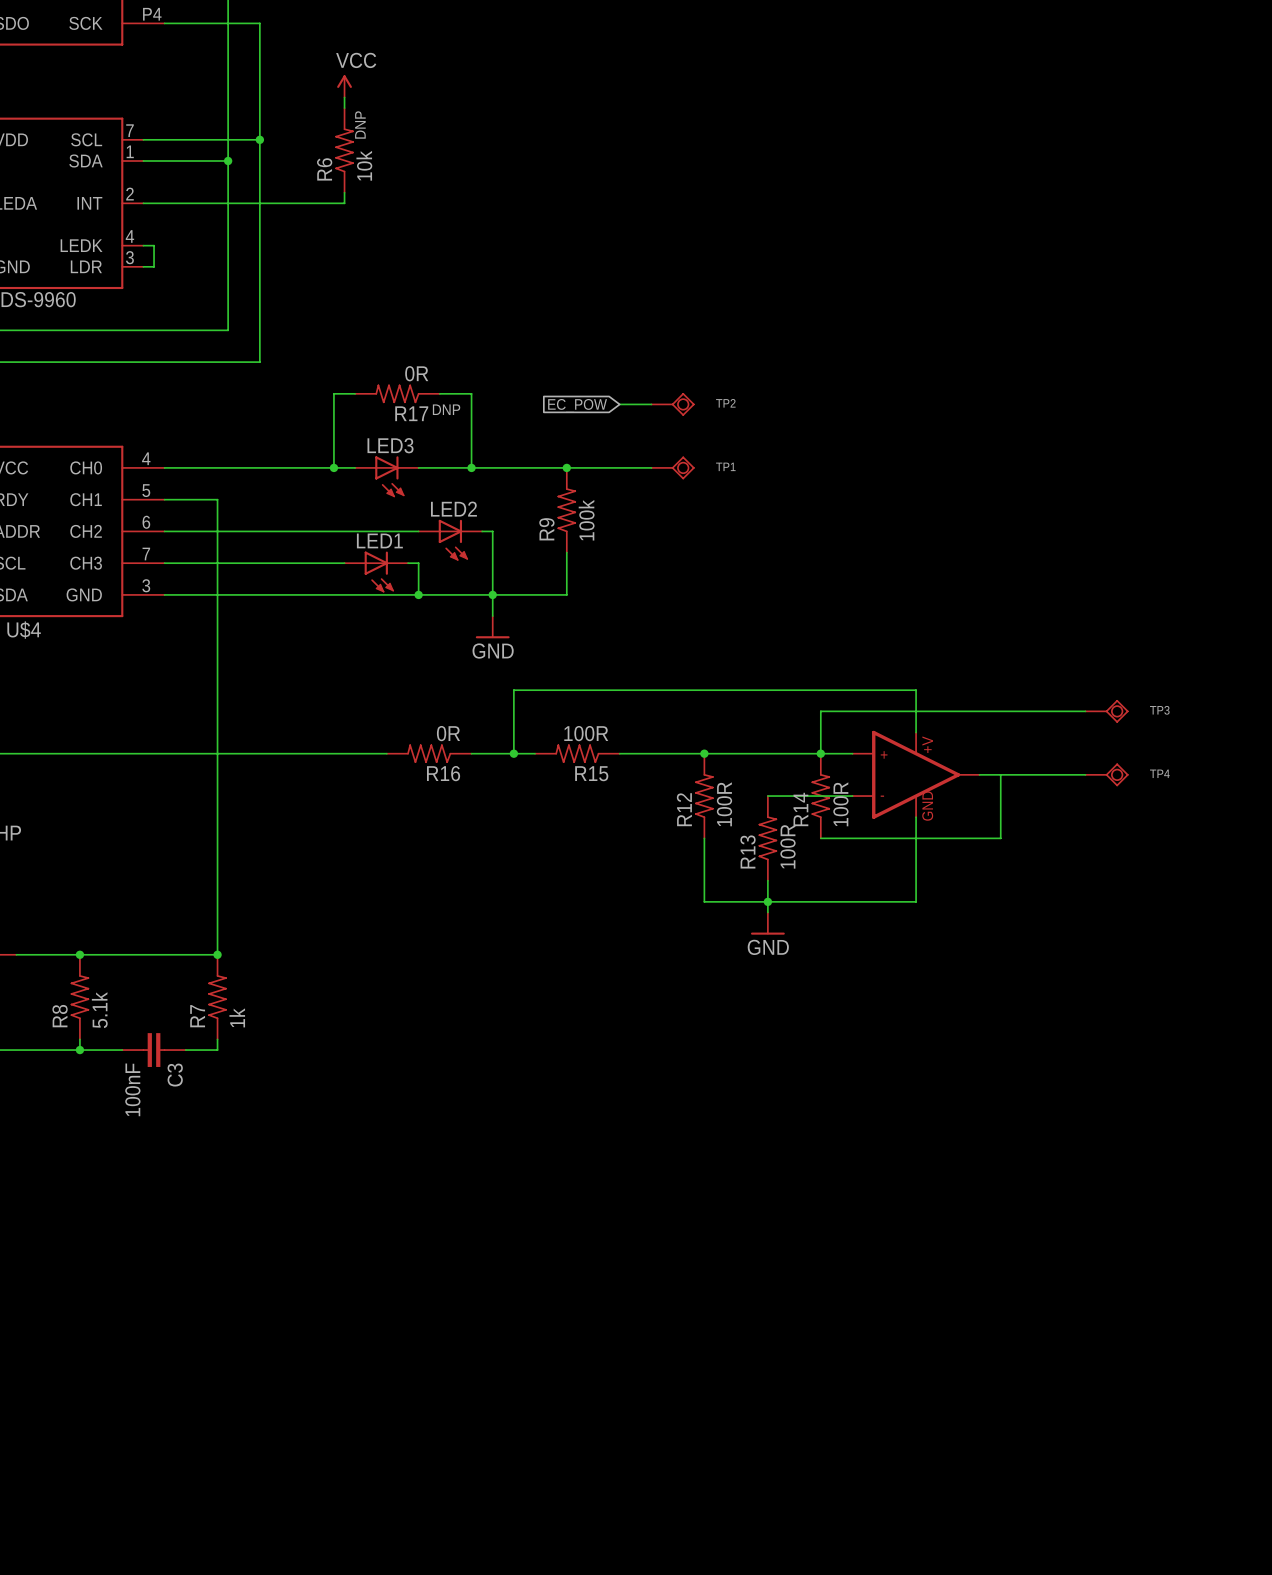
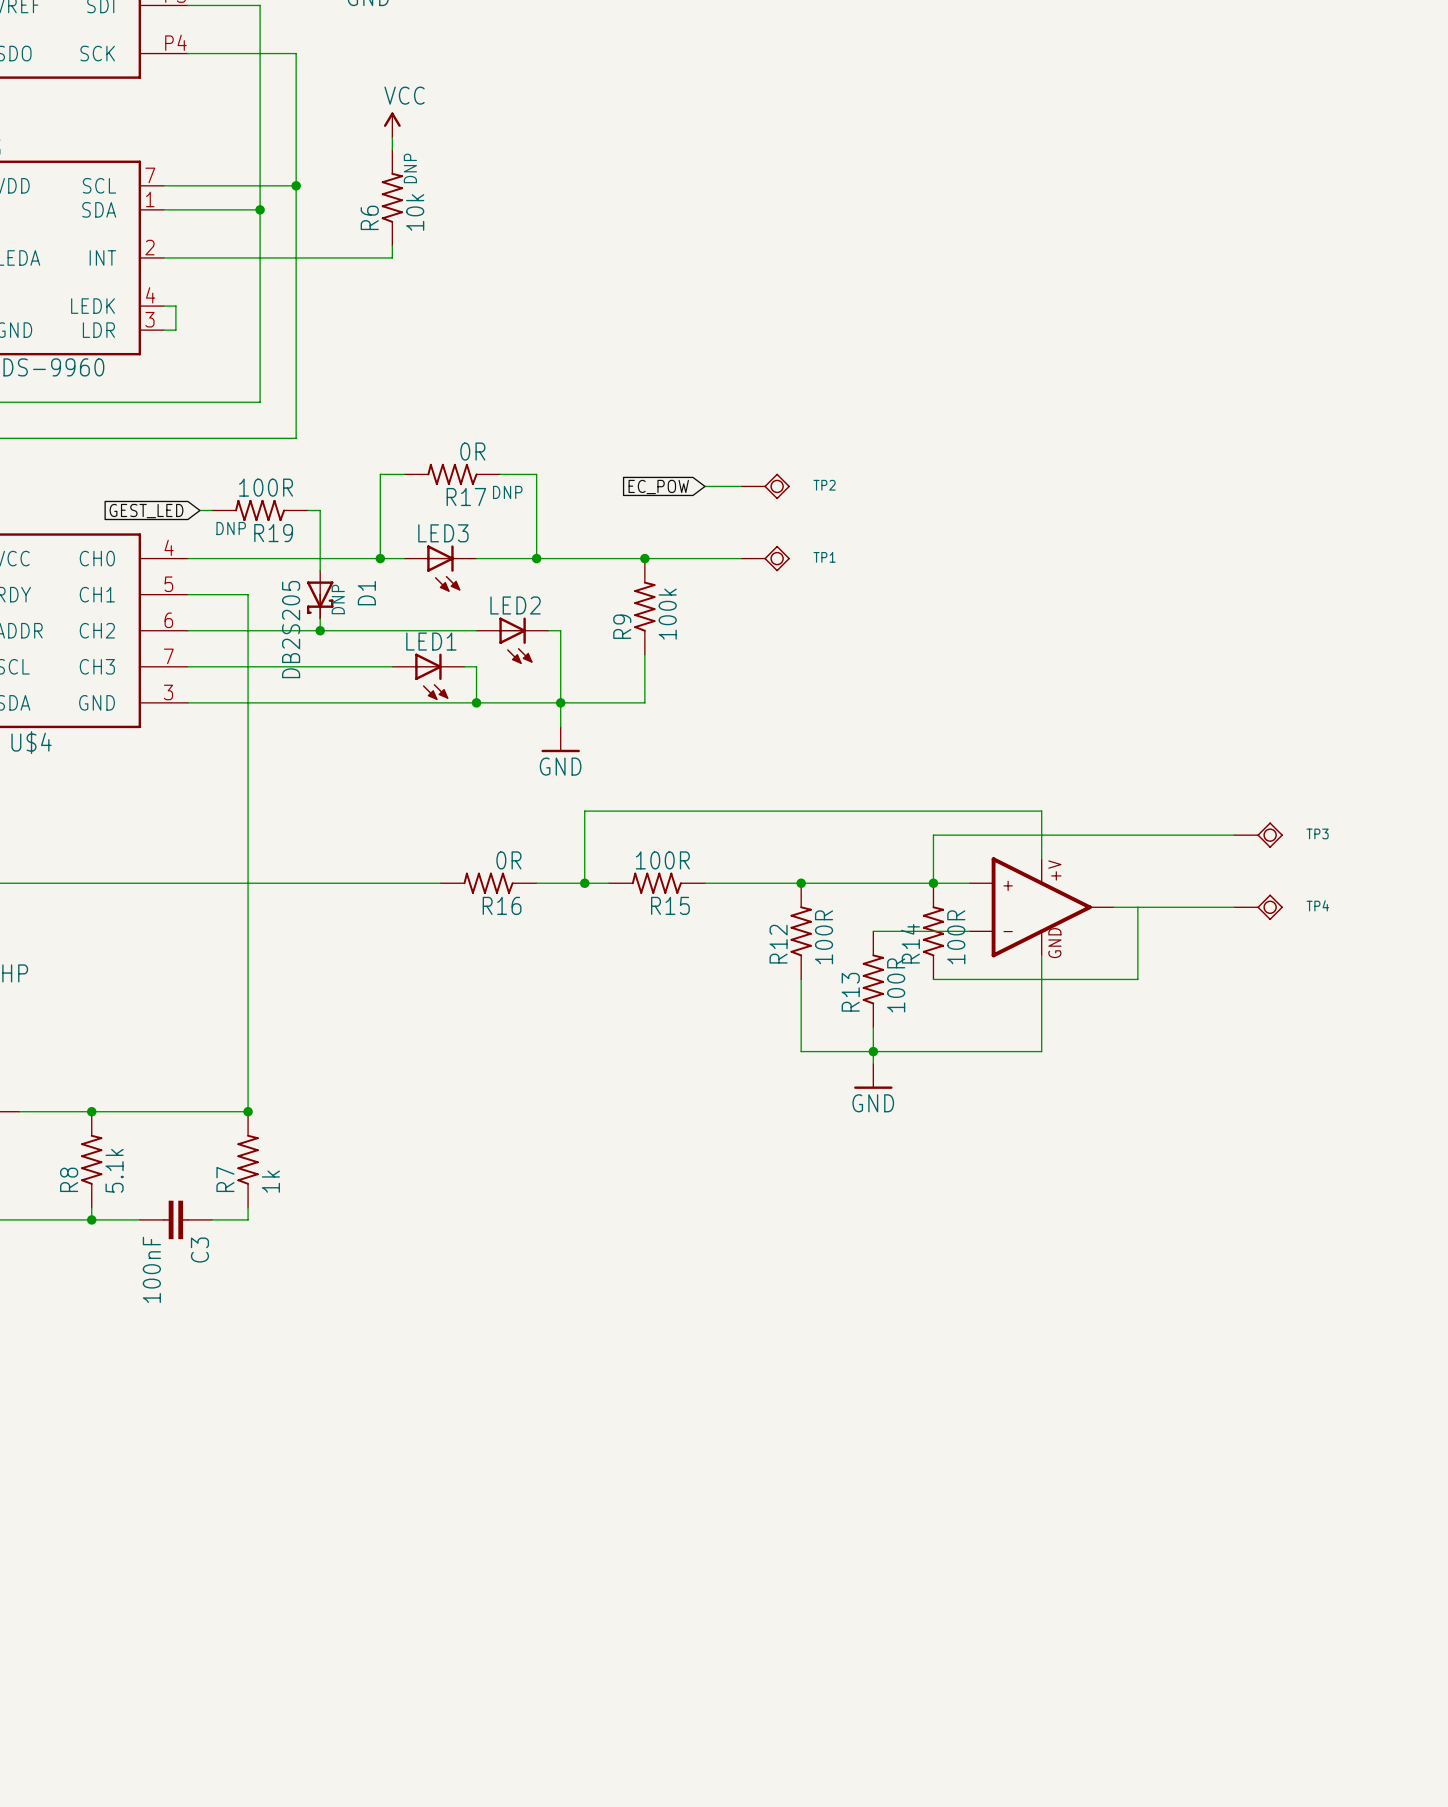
wire: none -> (199, 510) (211, 510)
R19: none -> 100R (260, 510)
wire: none -> (308, 510) (320, 510) (320, 570)
global label: none -> GEST_LED (146, 511)
D1: none -> DB2S205 (320, 594)
wire: none -> (320, 618) (320, 630)
junction: none -> (320, 630)

